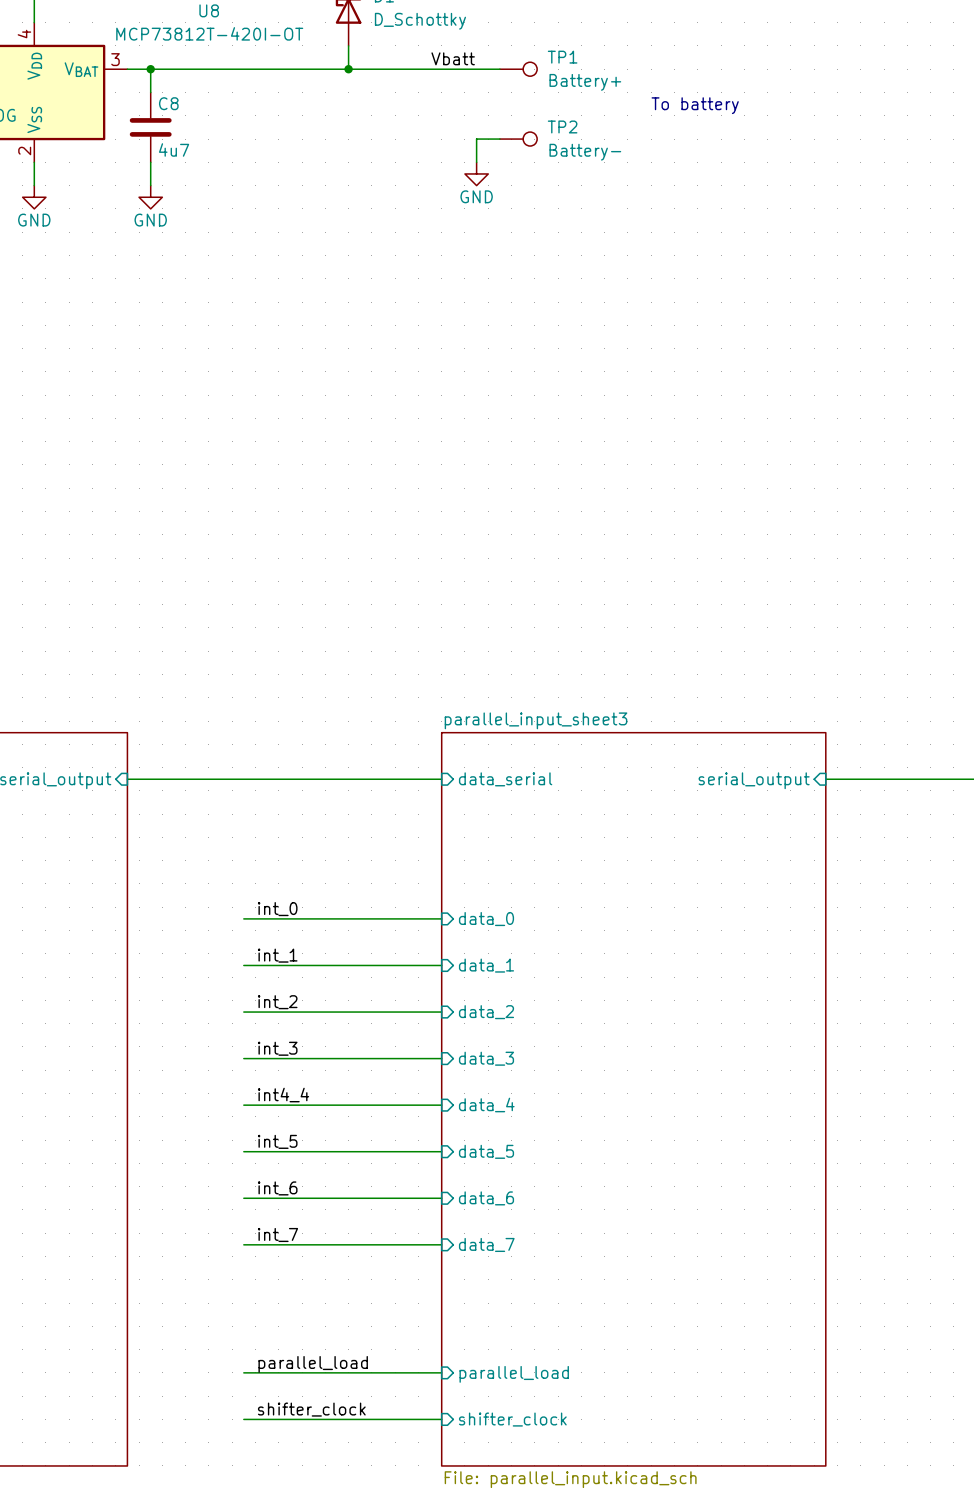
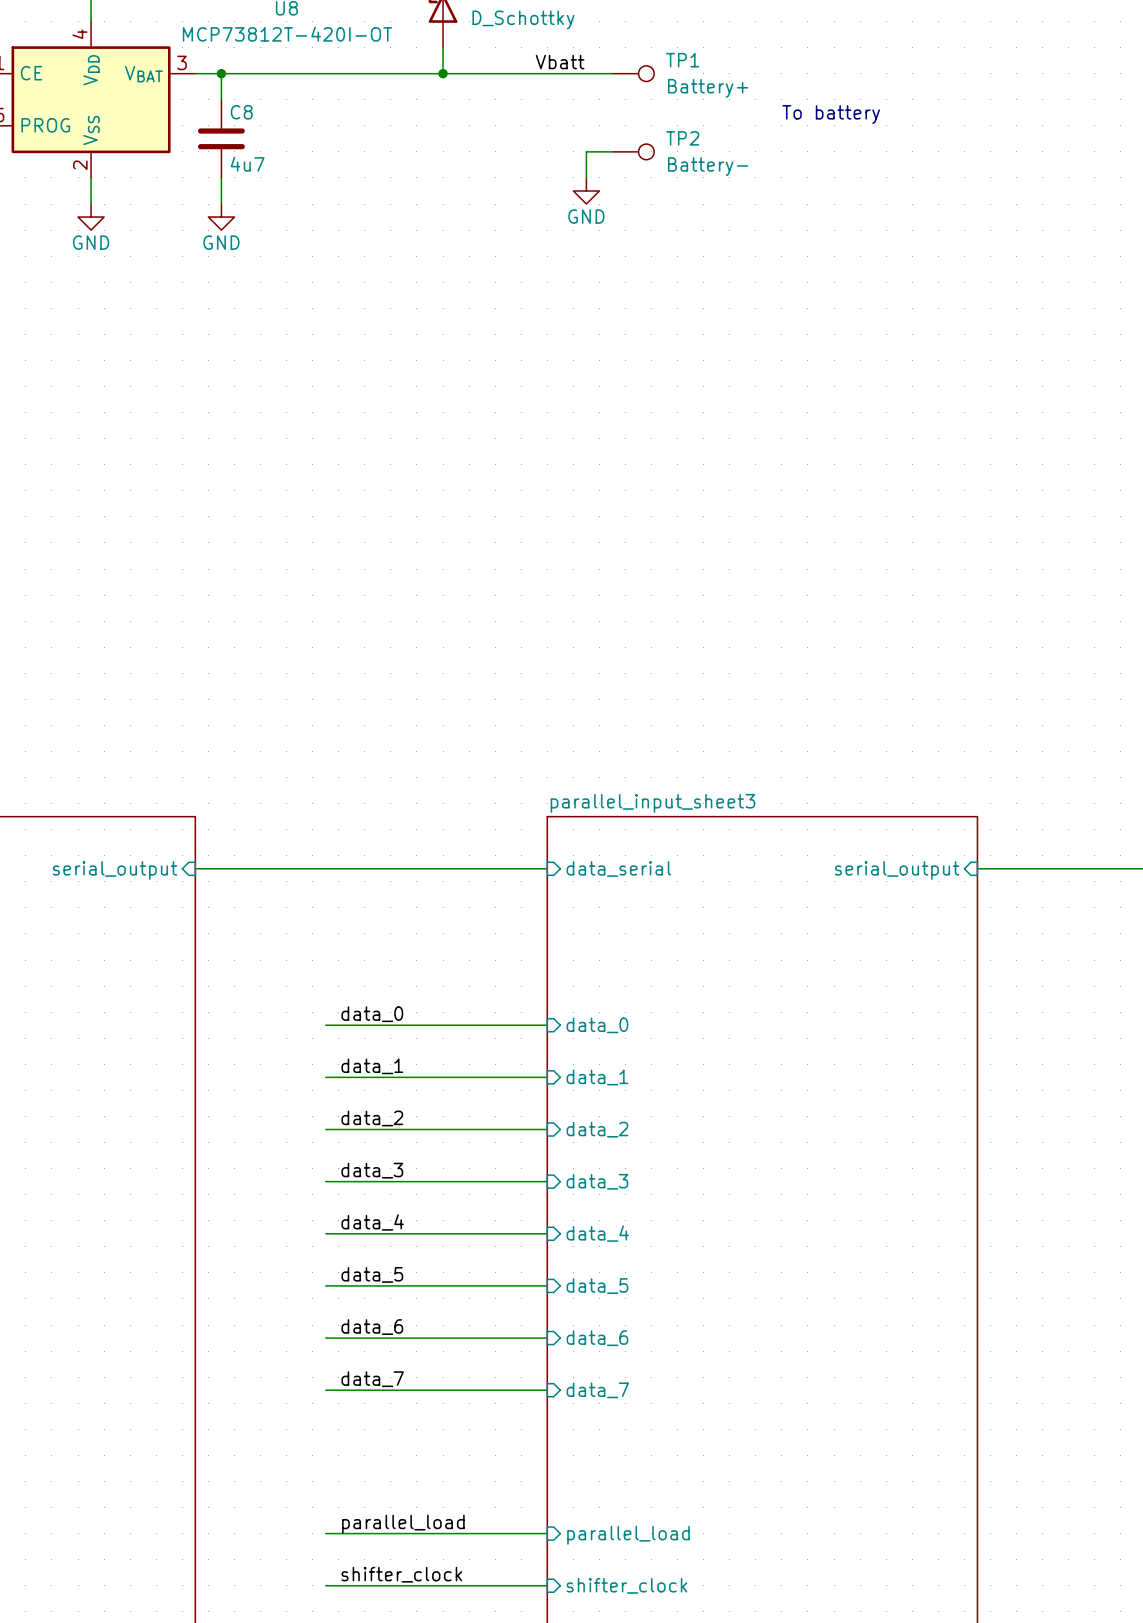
label: int_0 (277, 909) -> data_0 (372, 1014)
label: int_1 (277, 955) -> data_1 (372, 1066)
label: int_2 (277, 1002) -> data_2 (372, 1118)
label: int_3 (277, 1048) -> data_3 (372, 1170)
label: int4_4 (283, 1095) -> data_4 (372, 1222)
label: int_5 (277, 1141) -> data_5 (372, 1274)
label: int_6 (277, 1188) -> data_6 (372, 1327)
label: int_7 (277, 1234) -> data_7 (372, 1379)

